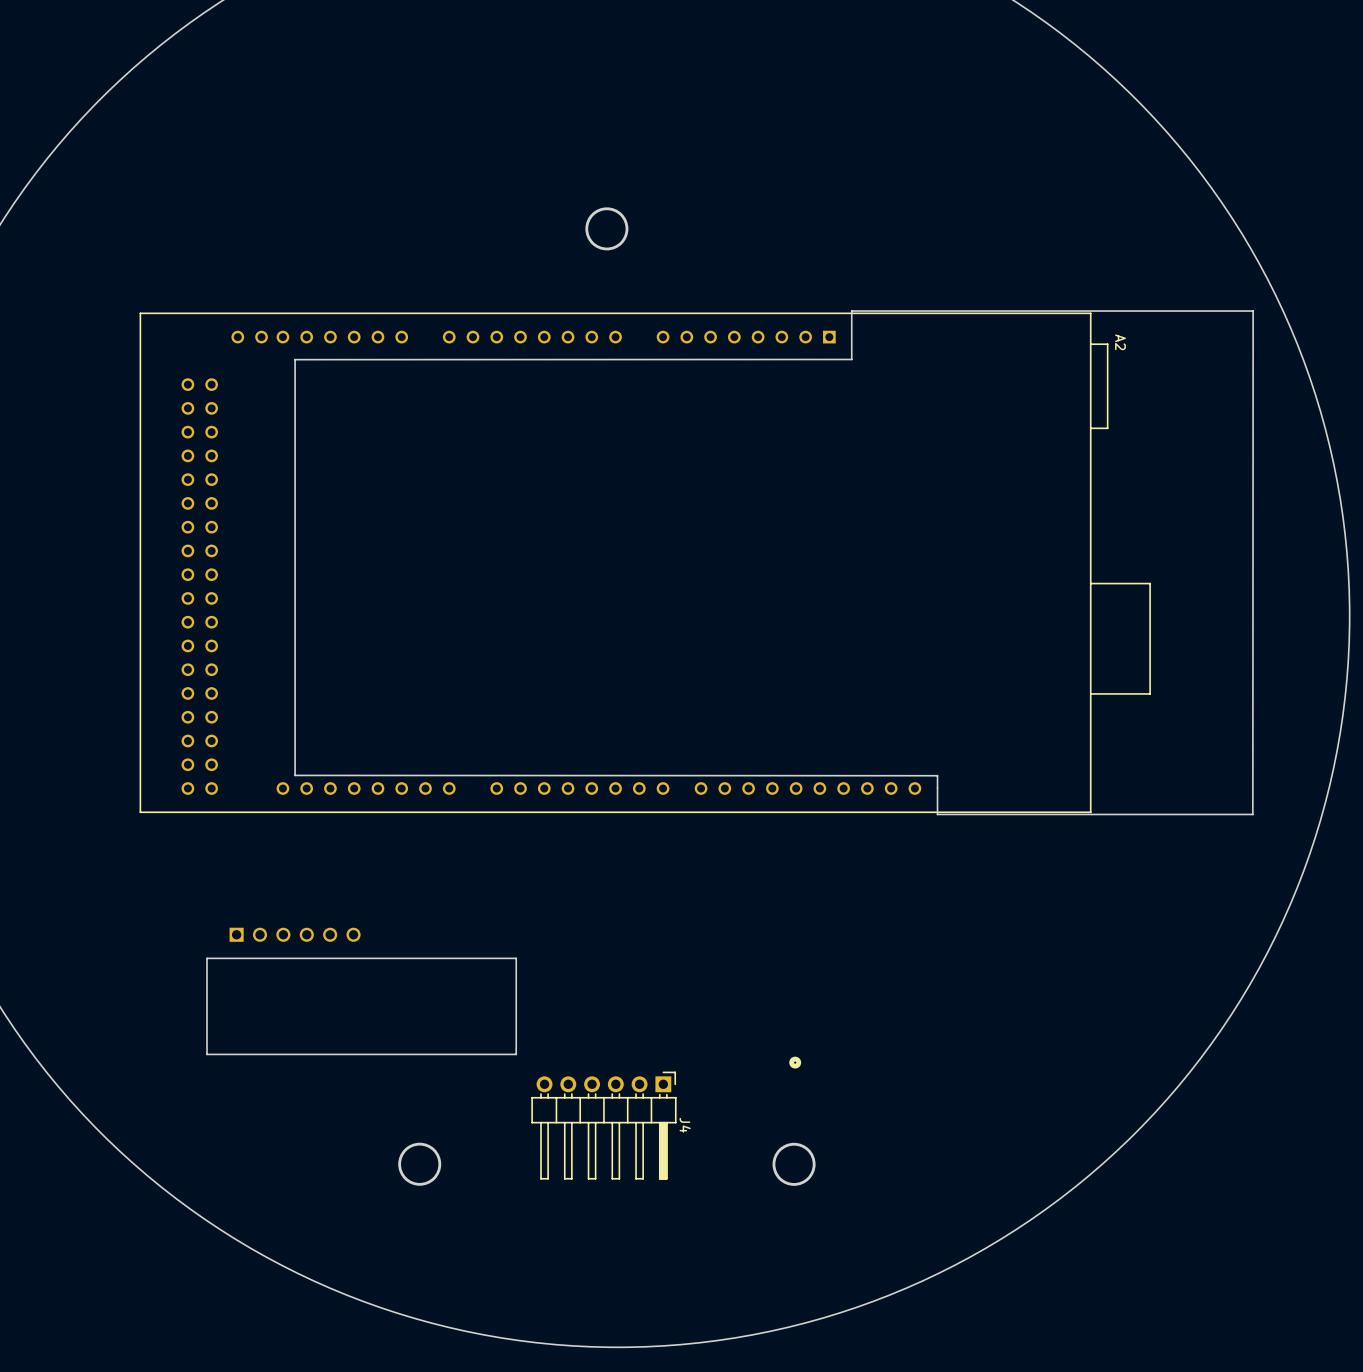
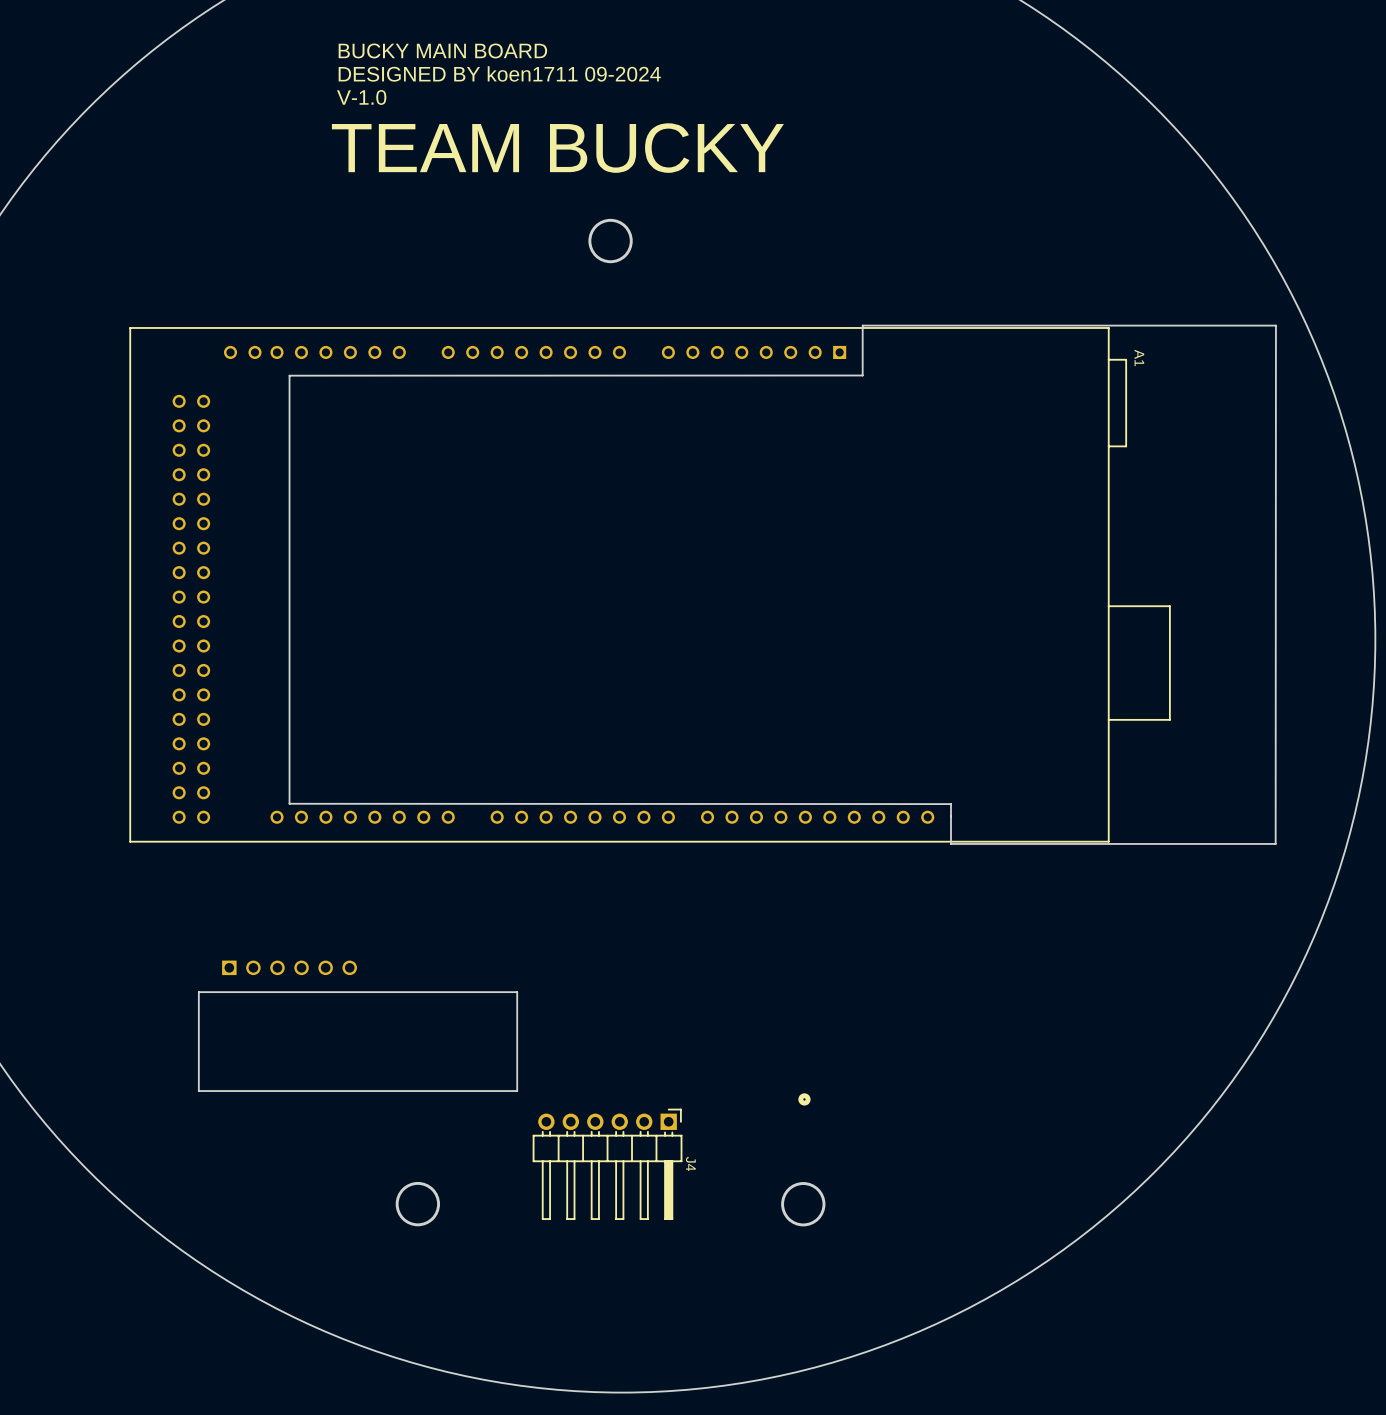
text: none -> BUCKY MAIN BOARD (442, 50)
text: none -> DESIGNED BY koen1711 09-2024 (499, 73)
text: none -> V-1.0 (361, 97)
text: none -> TEAM BUCKY (557, 148)
A2 name: A2 (1120, 342) -> A1 (1139, 357)

